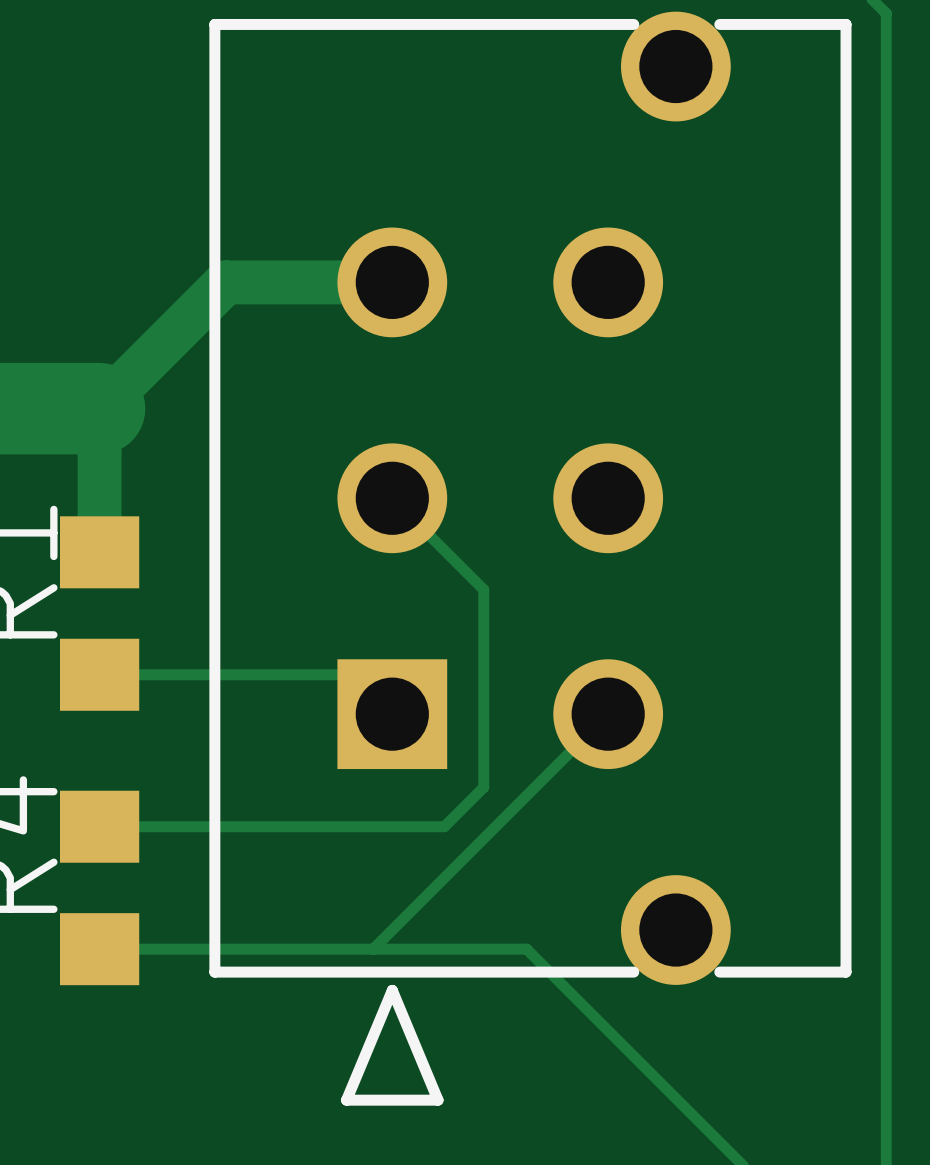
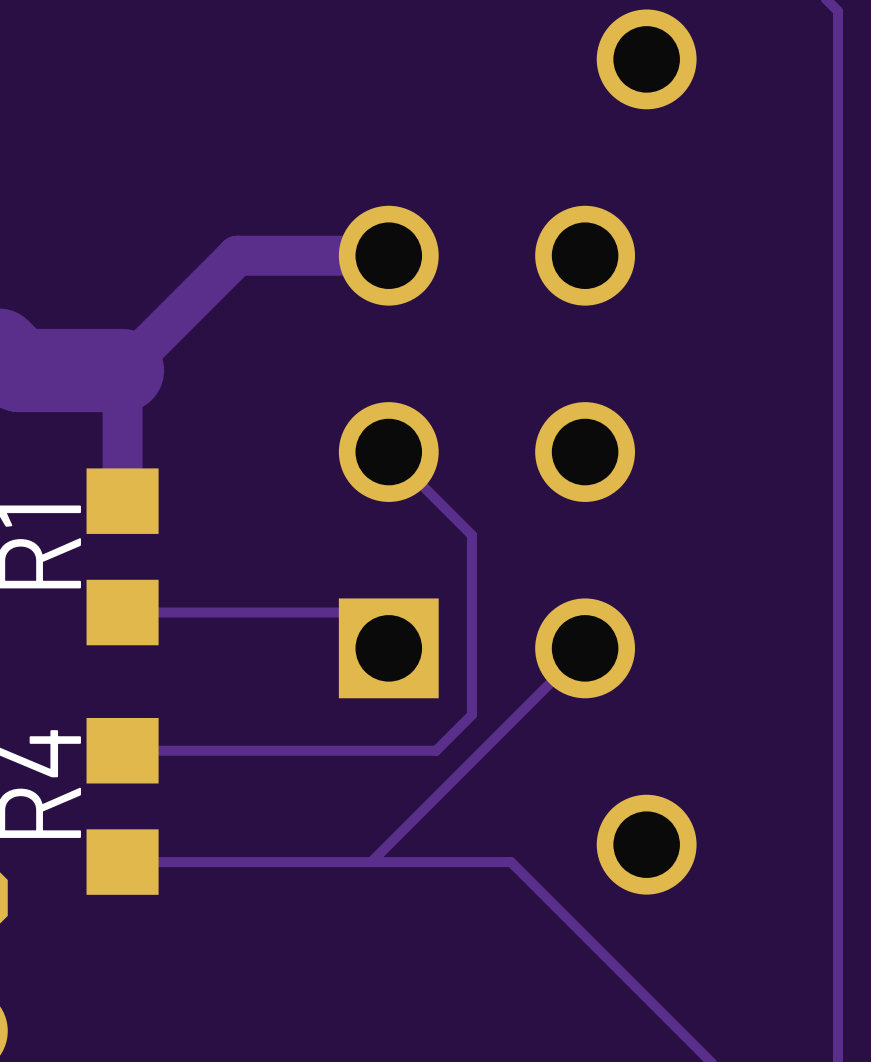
part footprint: [209, 11, 852, 1106] -> [338, 9, 697, 895]

